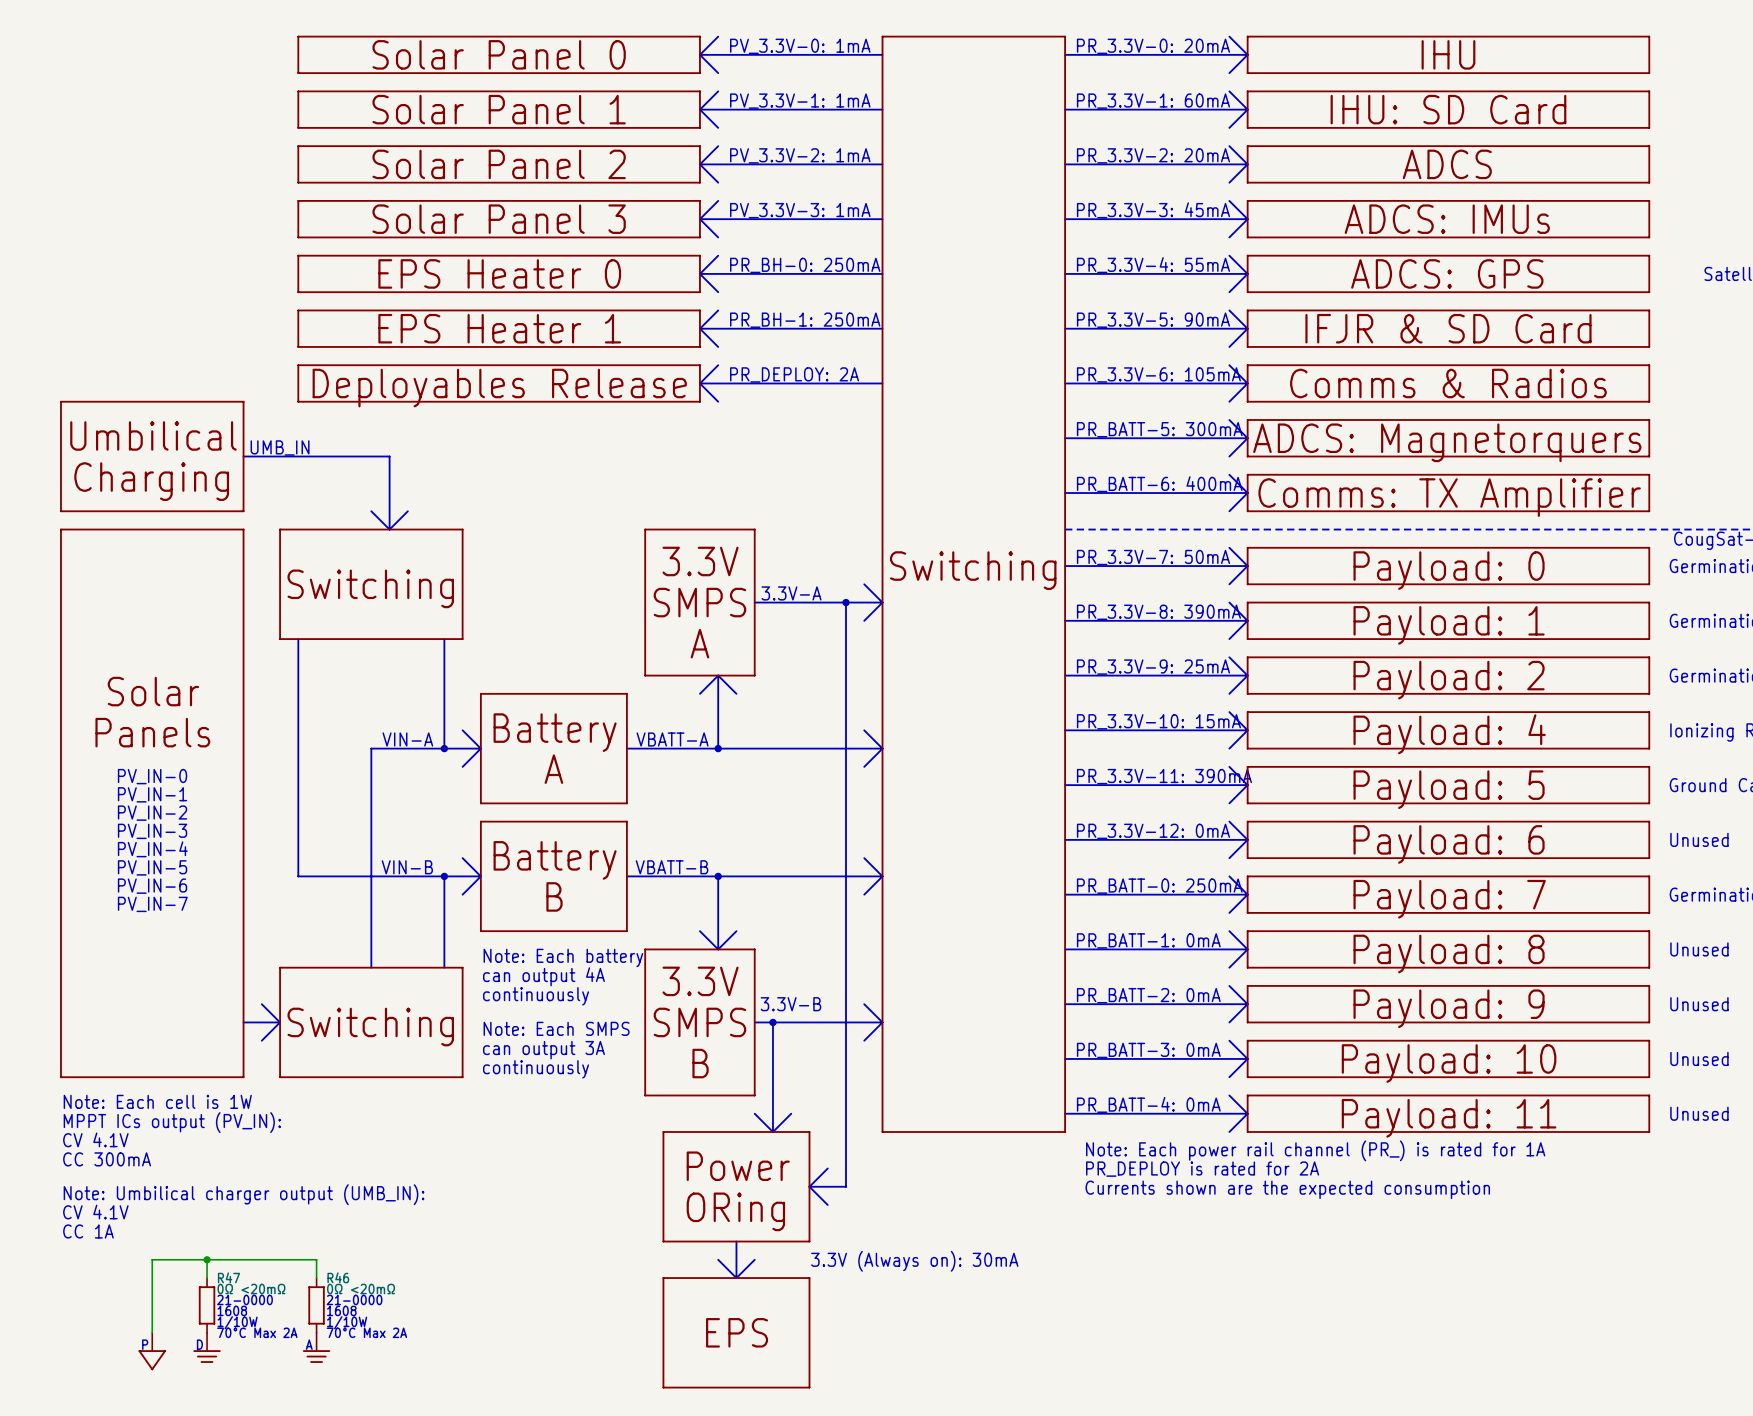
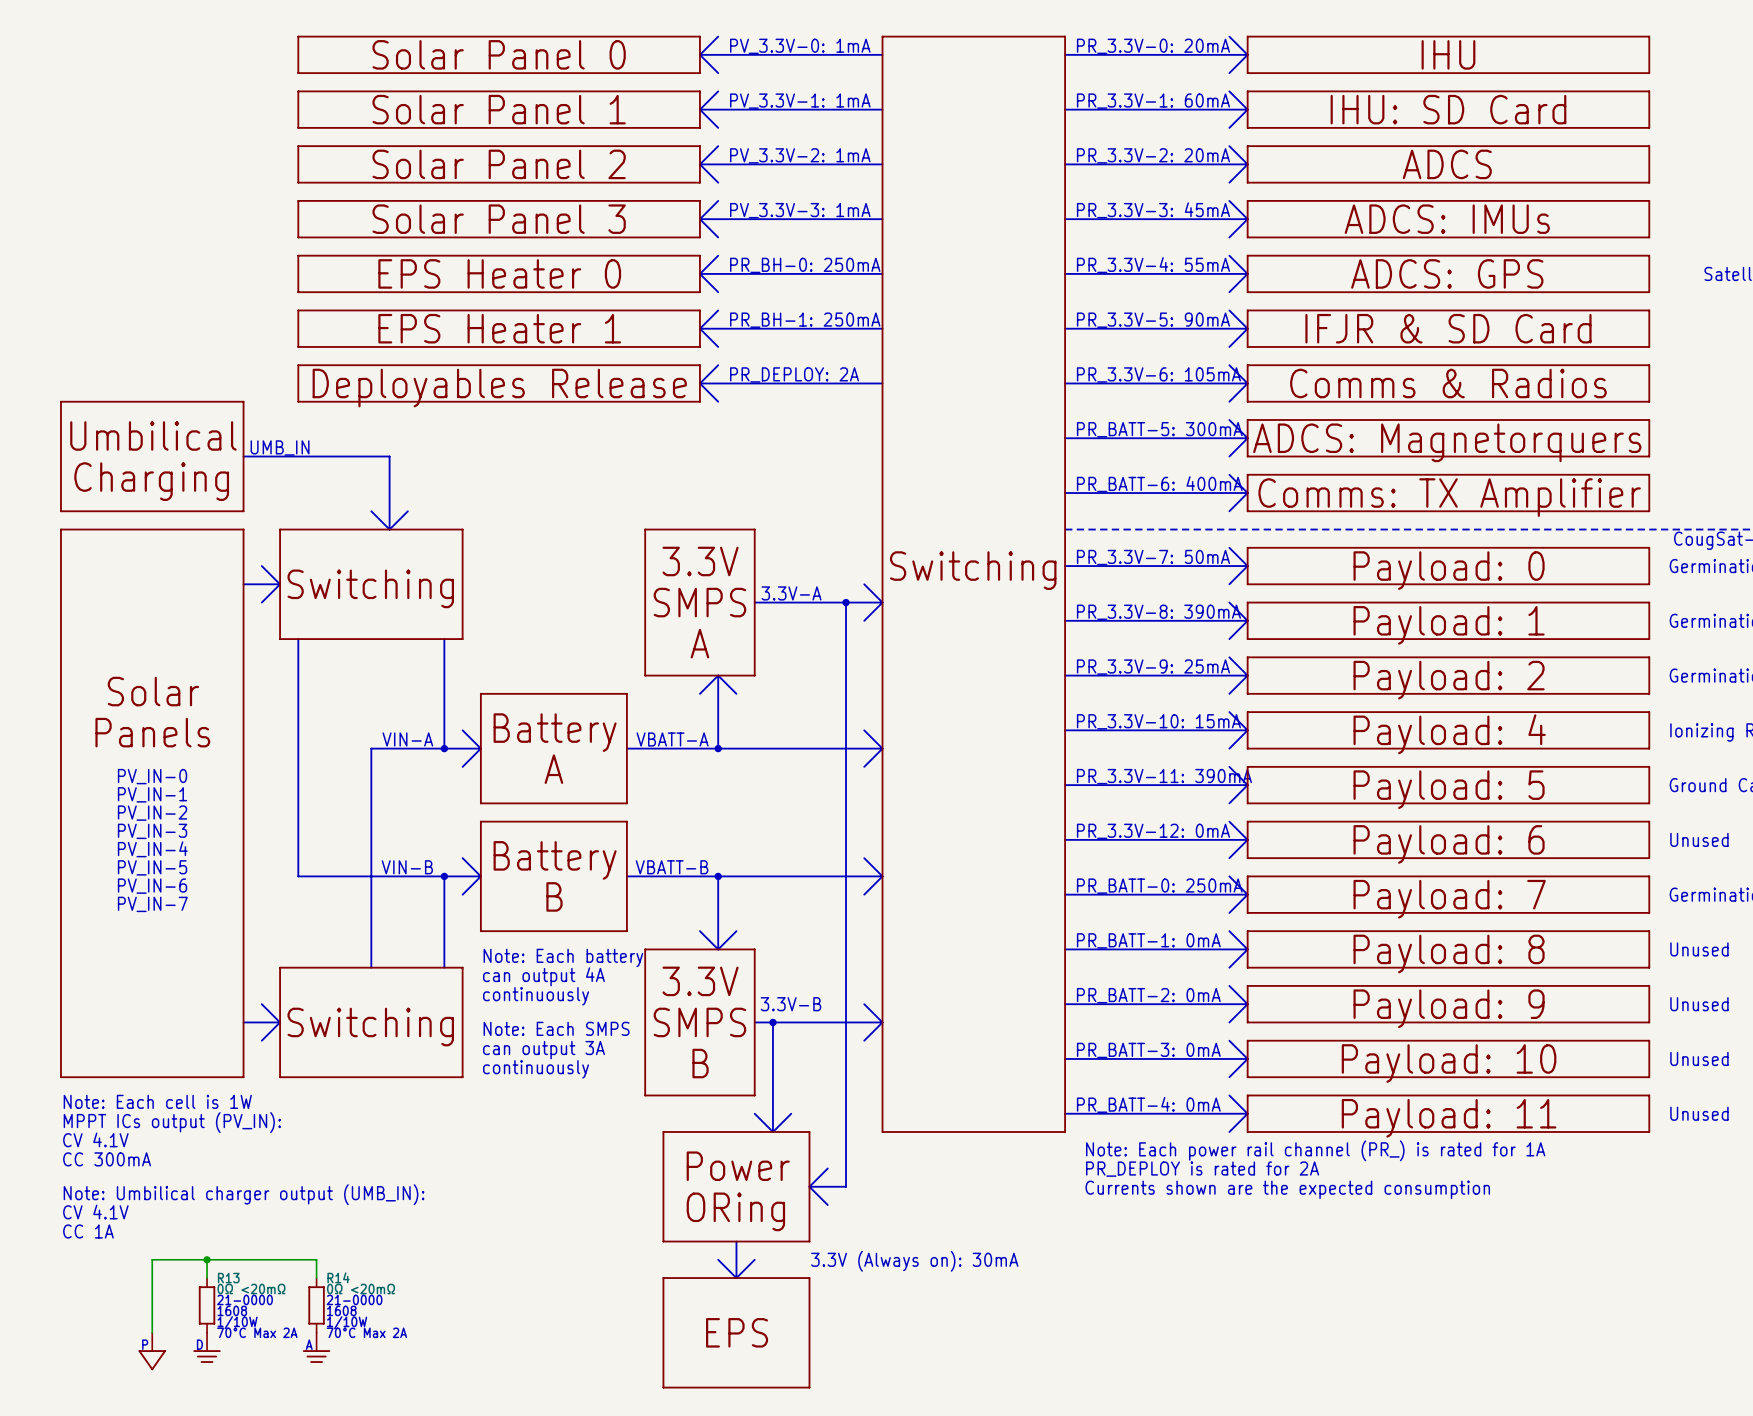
line: none -> (261, 566) (280, 584)
line: none -> (243, 584) (280, 584)
line: none -> (280, 584) (261, 602)
R47 name: R47 (228, 1277) -> R13 (228, 1278)
R46 name: R46 (338, 1277) -> R14 (338, 1277)

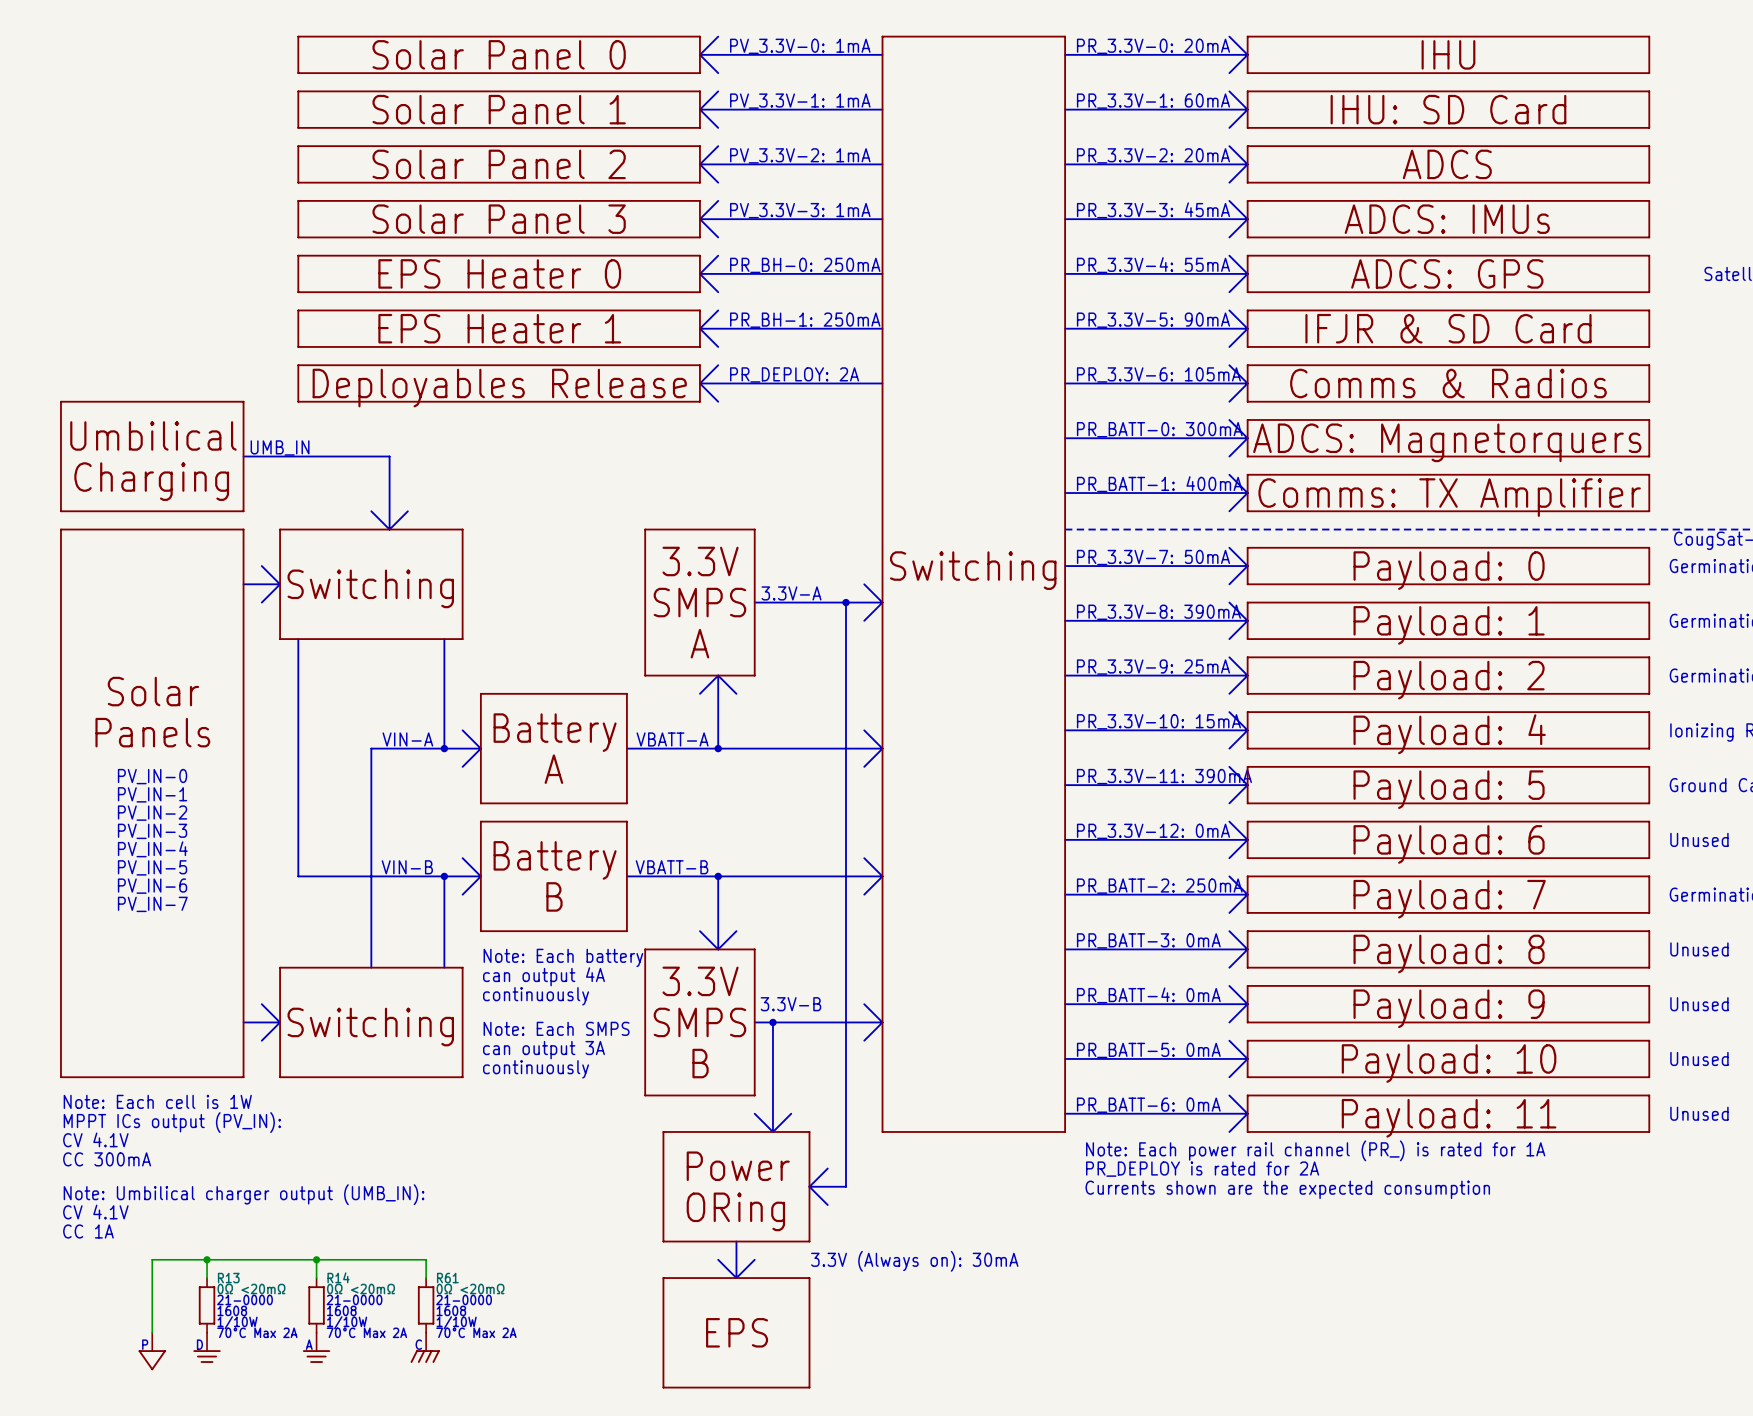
text: PR_BATT-5: 300mA (1159, 429) -> PR_BATT-0: 300mA (1159, 429)
text: PR_BATT-6: 400mA (1159, 484) -> PR_BATT-1: 400mA (1159, 484)
text: PR_BATT-0: 250mA (1159, 886) -> PR_BATT-2: 250mA (1159, 886)
text: PR_BATT-1: 0mA (1148, 940) -> PR_BATT-3: 0mA (1148, 940)
text: PR_BATT-2: 0mA (1148, 995) -> PR_BATT-4: 0mA (1148, 995)
text: PR_BATT-3: 0mA (1148, 1050) -> PR_BATT-5: 0mA (1148, 1050)
text: PR_BATT-4: 0mA (1148, 1104) -> PR_BATT-6: 0mA (1148, 1105)
wire: none -> (316, 1259) (426, 1259) (426, 1278)
junction: none -> (316, 1259)
R61: none -> 0Ω <20mΩ (426, 1305)
power symbol: none -> (425, 1347)

